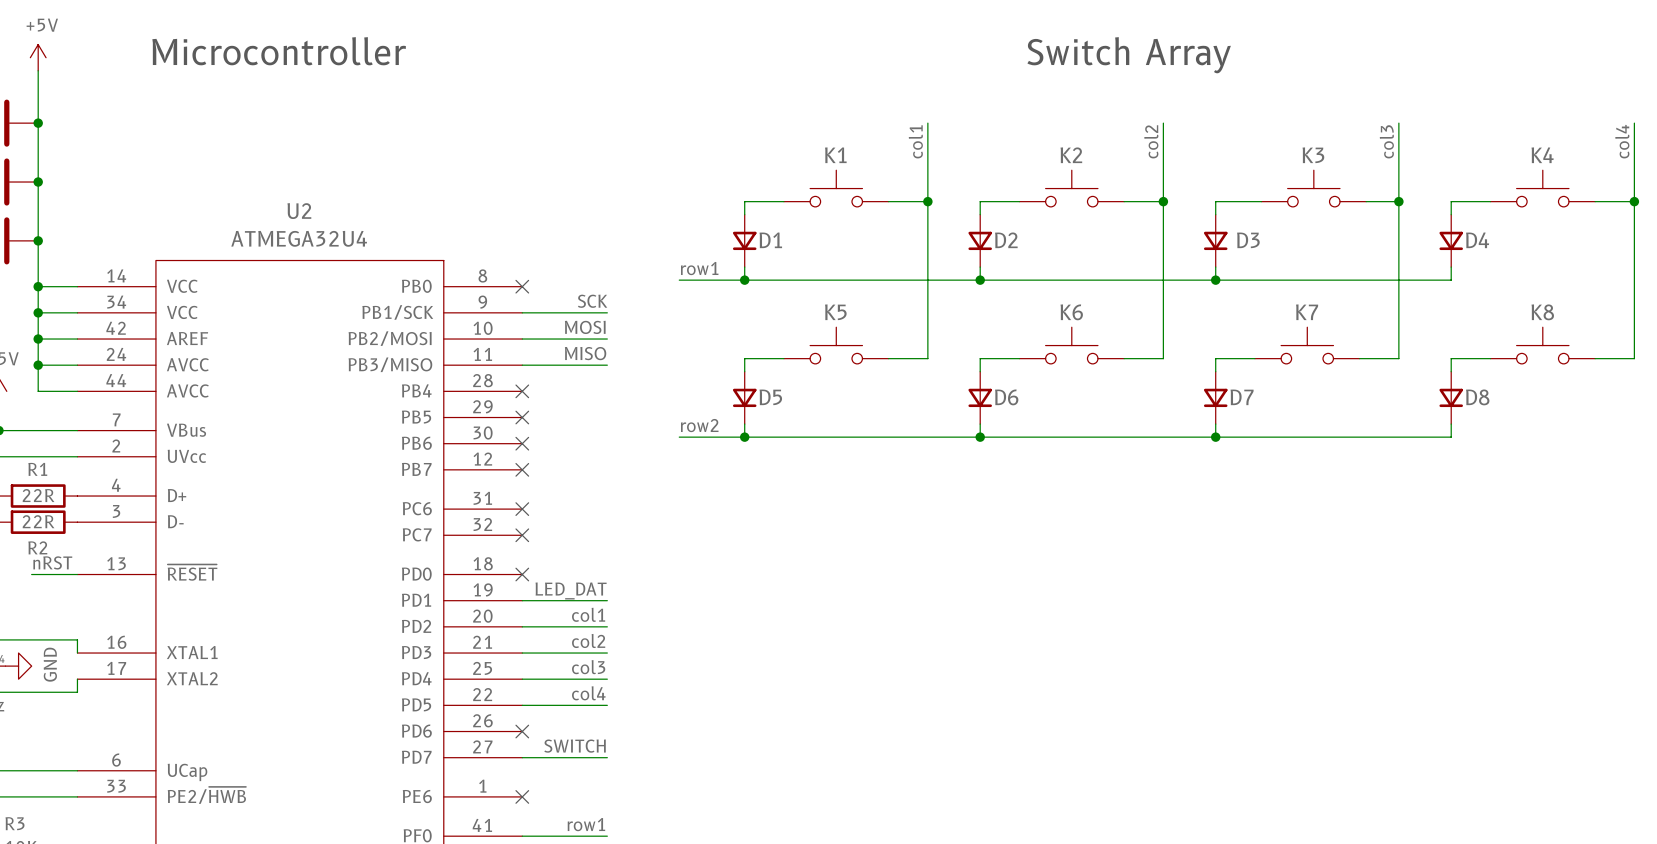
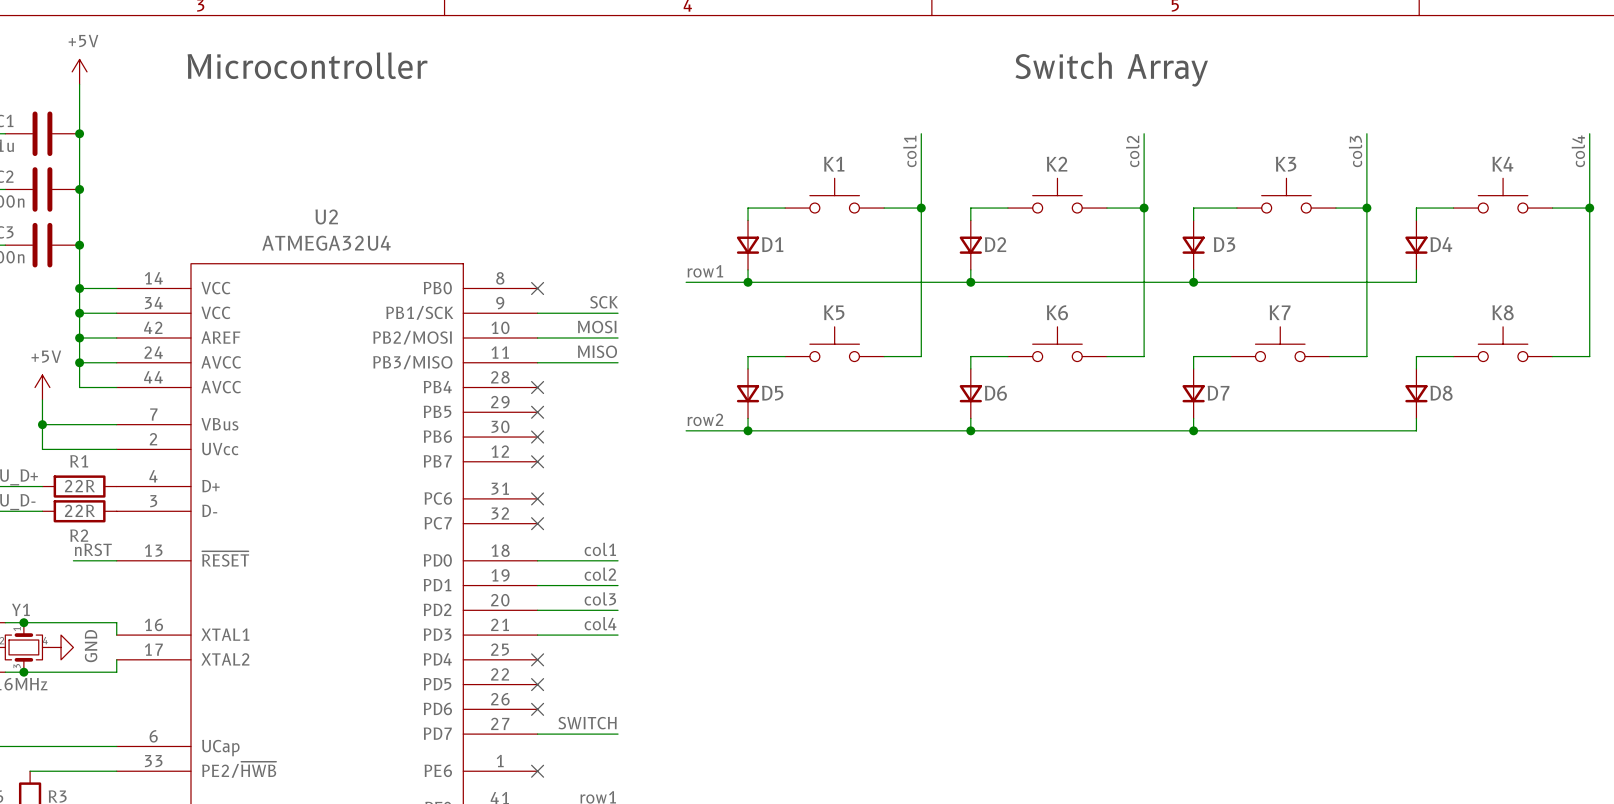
label: none -> col1 (600, 549)
no-connect mark: (522, 574) -> none
label: LED_DAT (571, 590) -> col2 (600, 574)
label: col1 (588, 614) -> col3 (600, 598)
label: col2 (588, 640) -> col4 (600, 623)
label: col3 (588, 667) -> none
wire: (522, 679) (607, 679) -> (537, 560) (618, 560)
no-connect mark: none -> (537, 659)
label: col4 (588, 693) -> none
wire: (522, 705) (607, 705) -> none
no-connect mark: none -> (537, 684)

